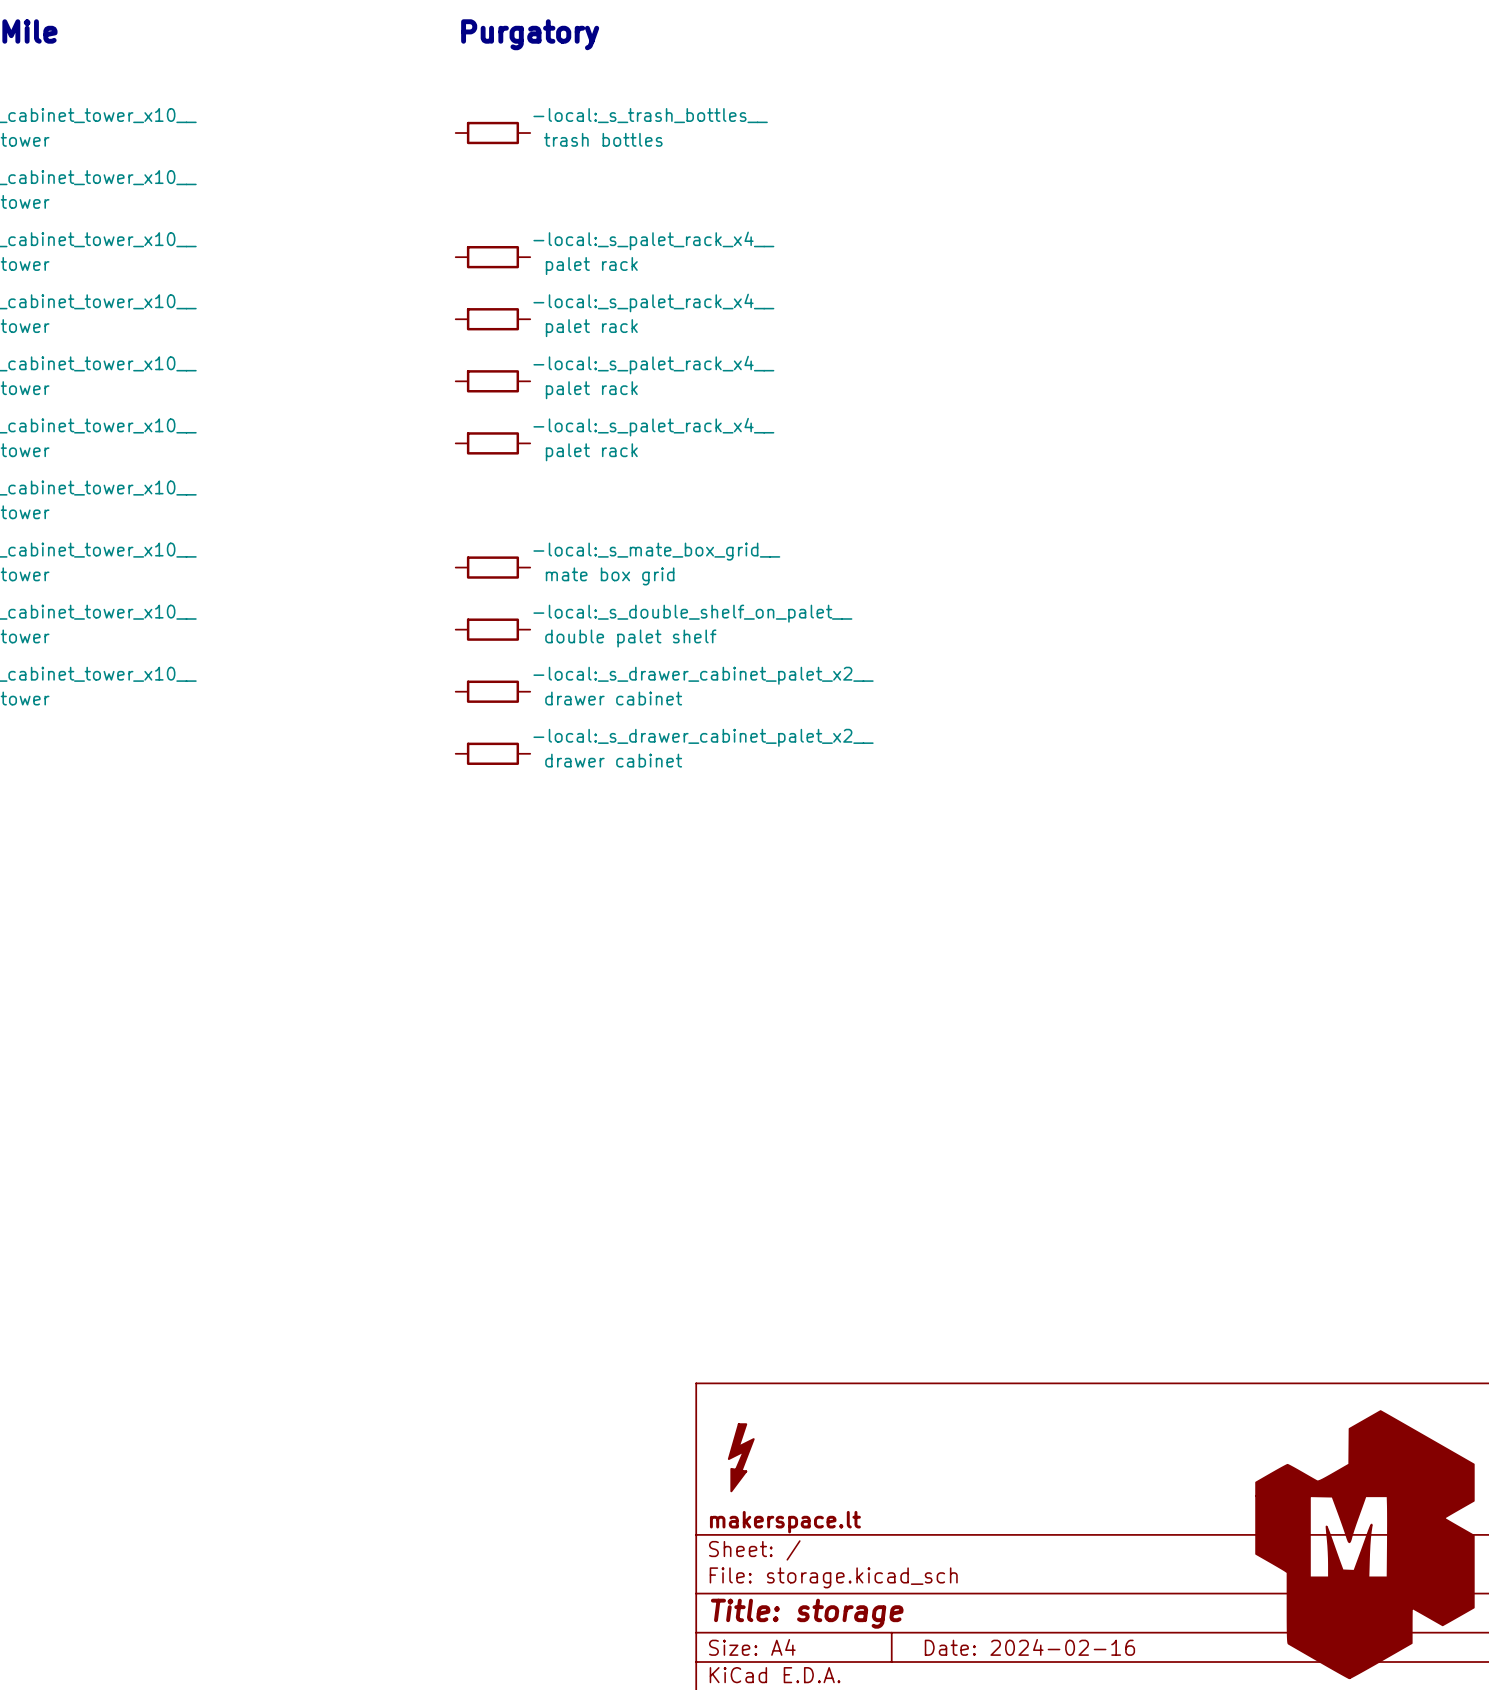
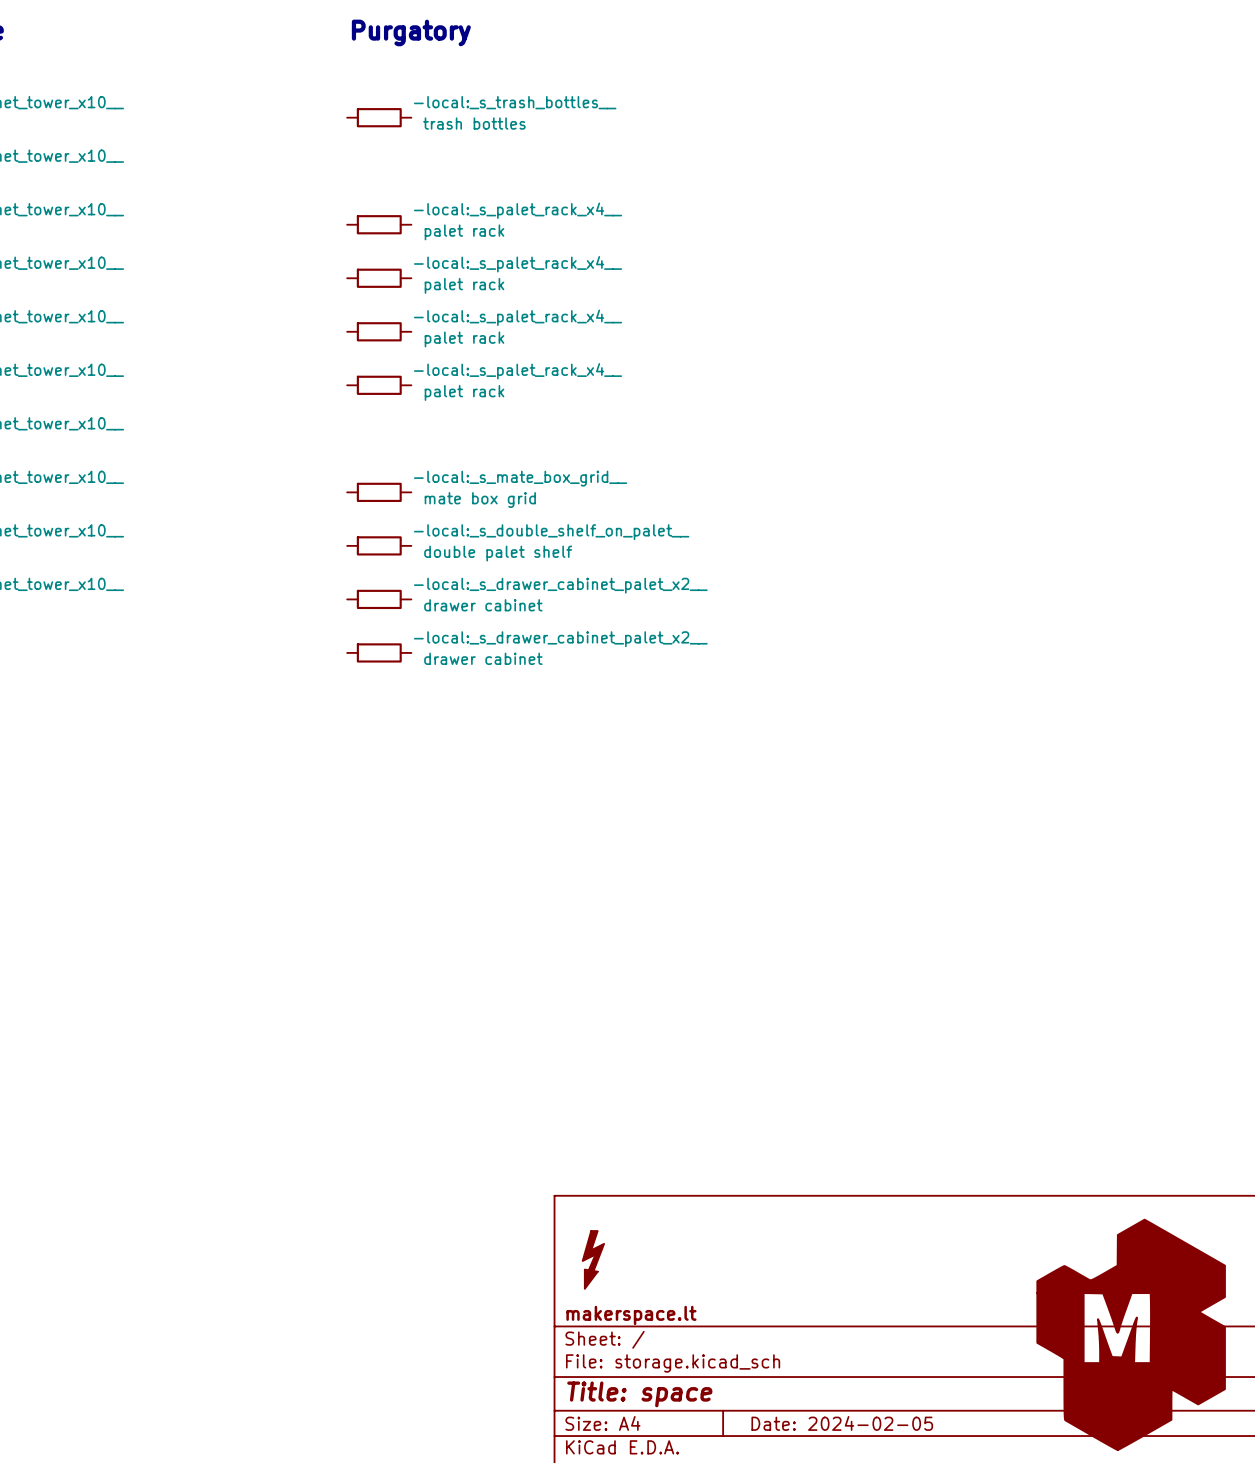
title block: Title: storage (807, 1613) -> Title: space (639, 1394)
title block: Date: 2024-02-16 (1029, 1647) -> Date: 2024-02-05 (842, 1423)

